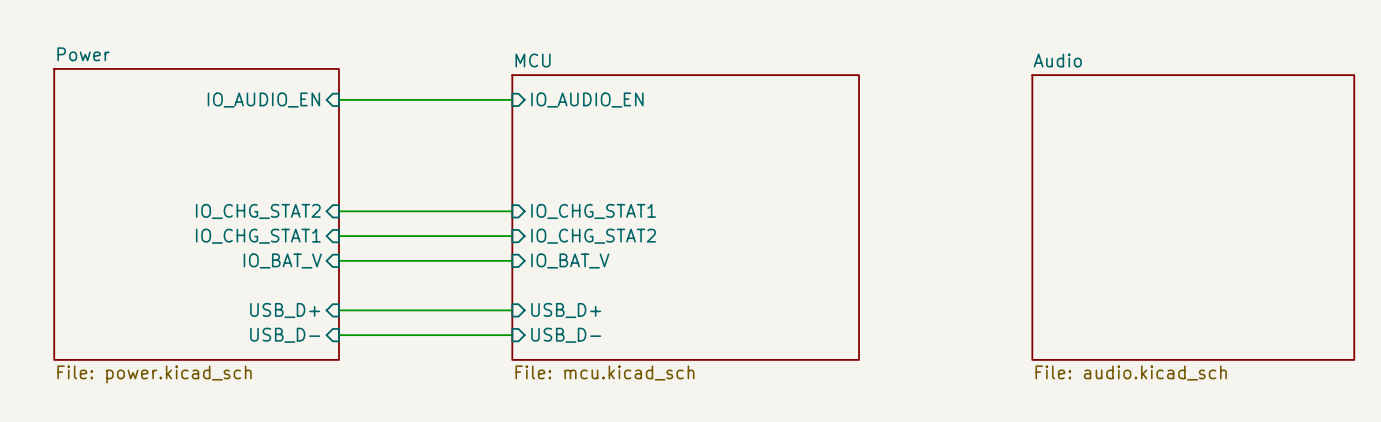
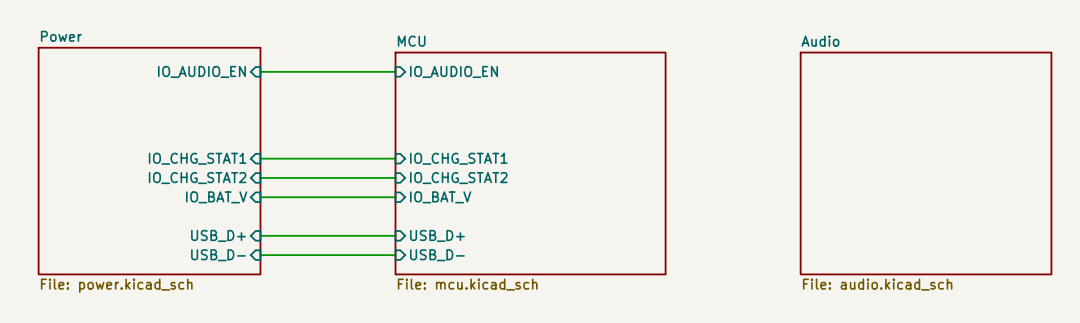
sheet pin: IO_CHG_STAT2 (258, 211) -> IO_CHG_STAT1 (197, 158)
sheet pin: IO_CHG_STAT1 (258, 236) -> IO_CHG_STAT2 (197, 178)

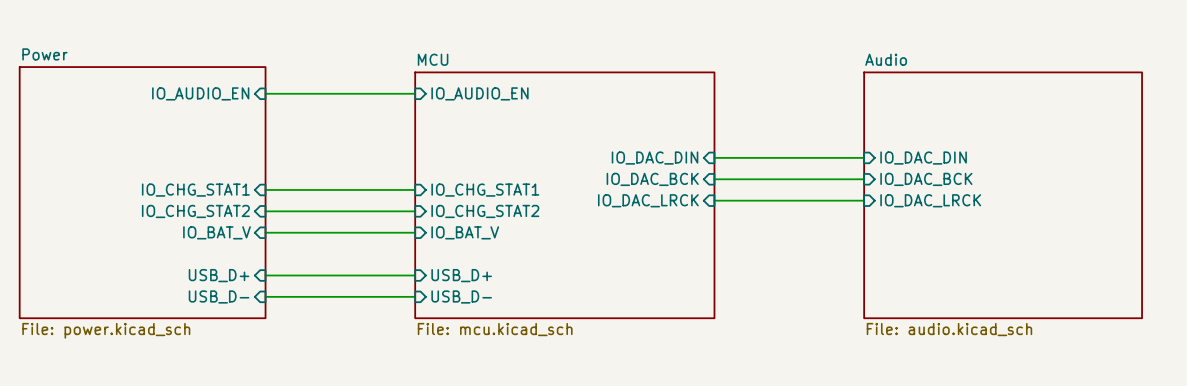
sheet pin: none -> IO_DAC_DIN (655, 158)
wire: none -> (714, 157) (864, 157)
sheet pin: none -> IO_DAC_DIN (923, 158)
sheet pin: none -> IO_DAC_BCK (652, 179)
wire: none -> (714, 179) (864, 179)
sheet pin: none -> IO_DAC_BCK (926, 179)
sheet pin: none -> IO_DAC_LRCK (648, 200)
wire: none -> (714, 200) (864, 200)
sheet pin: none -> IO_DAC_LRCK (930, 200)

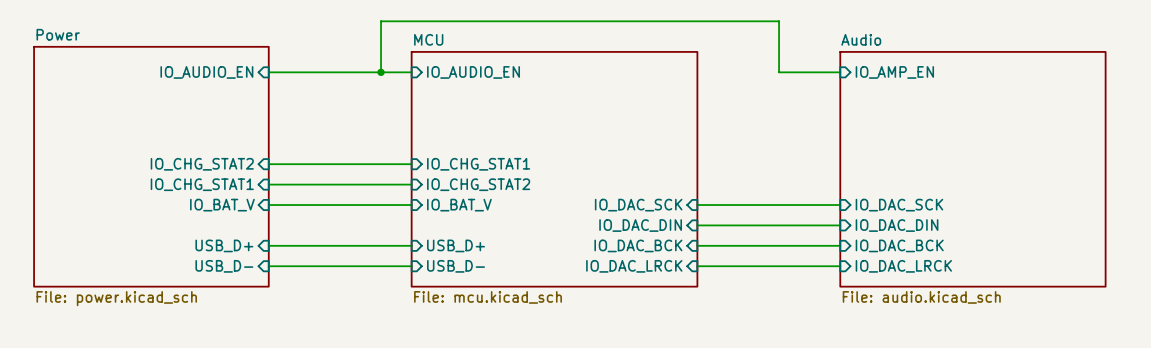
wire: none -> (381, 72) (381, 21) (779, 21) (779, 72) (840, 72)
junction: none -> (381, 72)
sheet pin: none -> IO_AMP_EN (894, 72)
wire: (714, 157) (864, 157) -> (697, 205) (840, 205)
sheet pin position: IO_DAC_DIN (655, 158) -> IO_DAC_DIN (640, 225)
sheet pin position: IO_DAC_DIN (923, 158) -> IO_DAC_DIN (897, 225)
sheet pin position: IO_DAC_BCK (652, 179) -> IO_DAC_BCK (638, 245)
wire: (714, 179) (864, 179) -> (697, 225) (840, 225)
sheet pin position: IO_DAC_BCK (926, 179) -> IO_DAC_BCK (899, 245)
sheet pin: IO_CHG_STAT1 (195, 190) -> IO_CHG_STAT2 (202, 164)
sheet pin position: IO_DAC_LRCK (648, 200) -> IO_DAC_LRCK (634, 266)
wire: (714, 200) (864, 200) -> (697, 245) (840, 245)
sheet pin position: IO_DAC_LRCK (930, 200) -> IO_DAC_LRCK (903, 266)
sheet pin: IO_CHG_STAT2 (195, 211) -> IO_CHG_STAT1 (202, 184)
sheet pin: none -> IO_DAC_SCK (638, 205)
sheet pin: none -> IO_DAC_SCK (899, 205)
wire: none -> (697, 266) (840, 266)

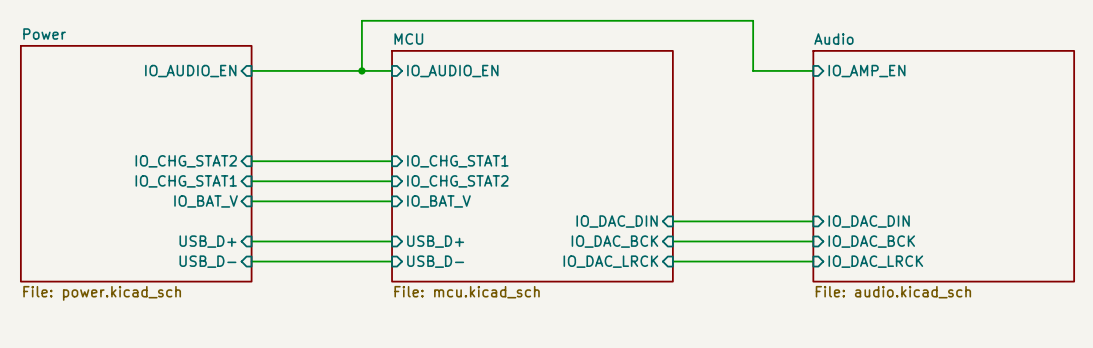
sheet pin: IO_DAC_SCK (638, 205) -> none
wire: (697, 205) (840, 205) -> none
sheet pin: IO_DAC_SCK (899, 205) -> none

